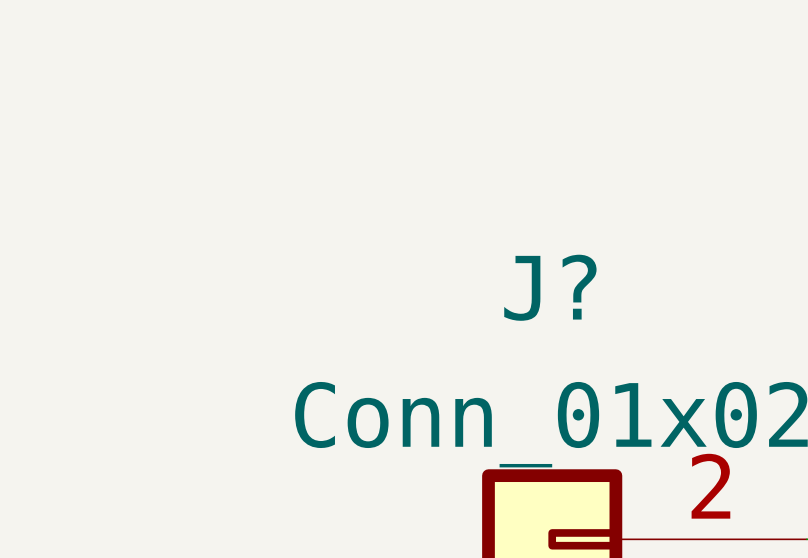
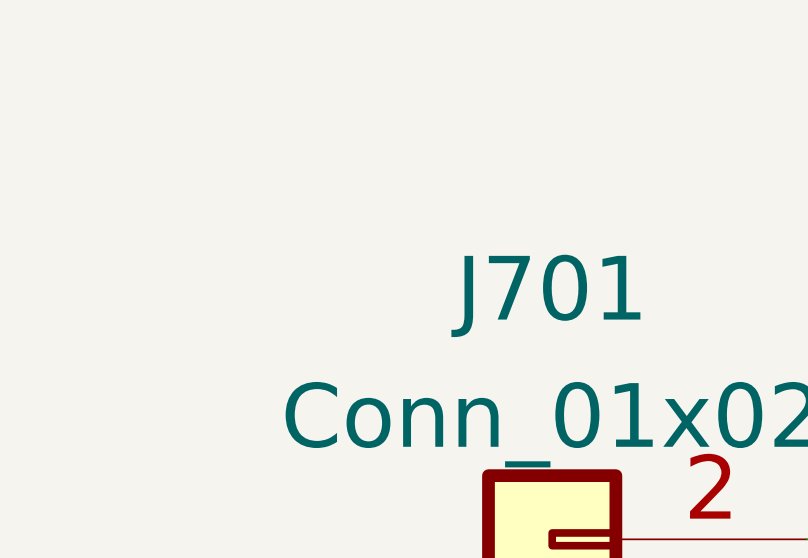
J? name: J? (550, 287) -> J701 (545, 295)

